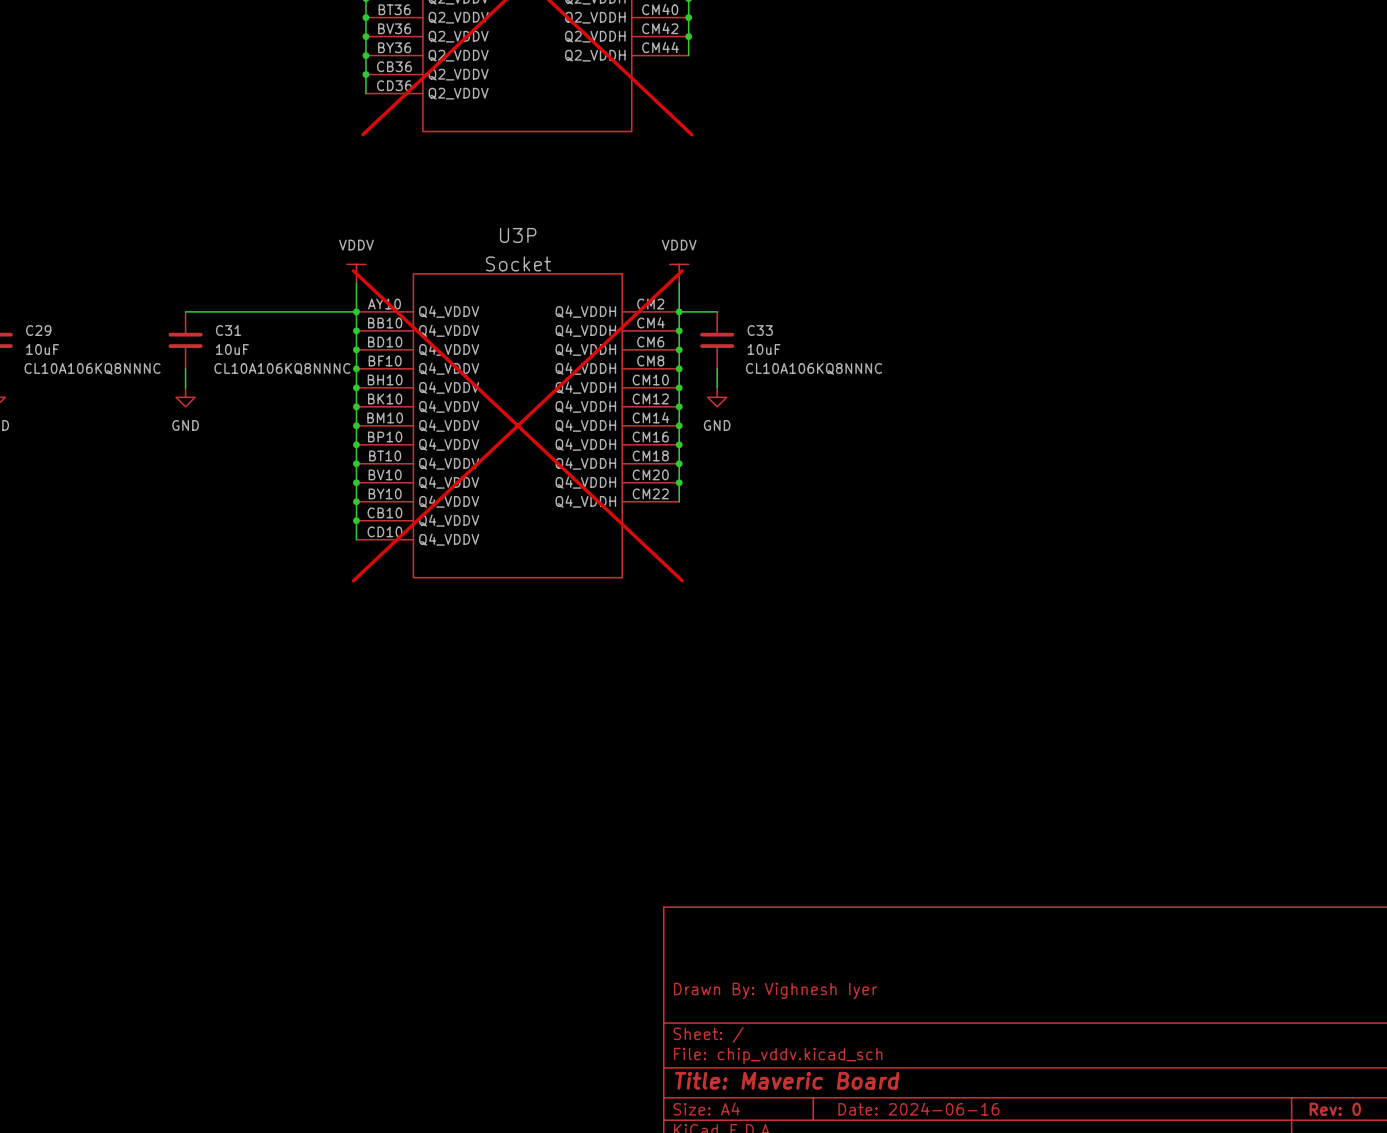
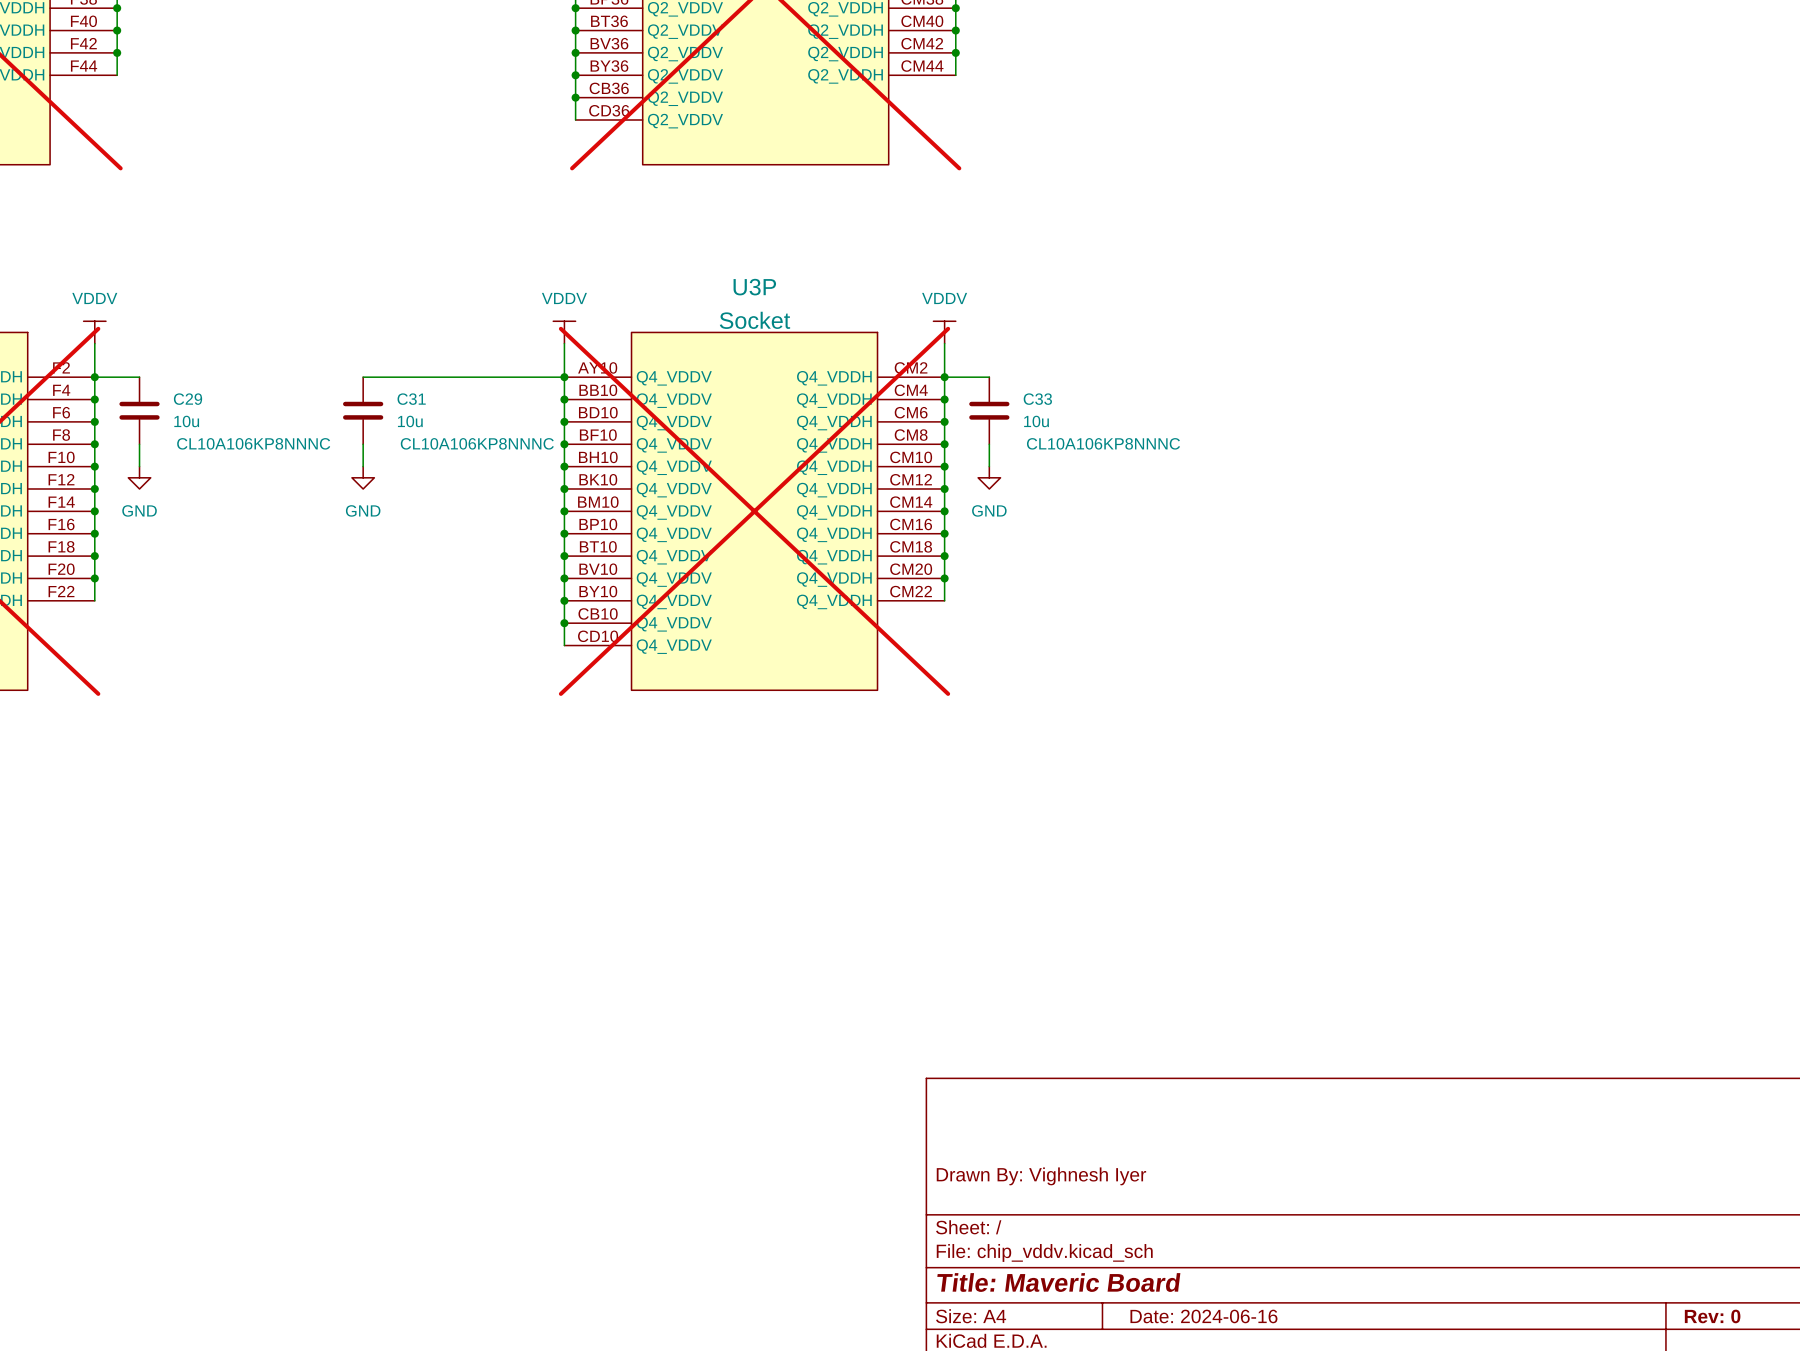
C29 value: 10uF (42, 349) -> 10u (186, 421)
C31 value: 10uF (232, 349) -> 10u (410, 421)
C33 value: 10uF (764, 349) -> 10u (1036, 421)
C29 text: CL10A106KQ8NNNC (92, 368) -> CL10A106KP8NNNC (253, 443)
C31 text: CL10A106KQ8NNNC (282, 368) -> CL10A106KP8NNNC (477, 443)
C33 text: CL10A106KQ8NNNC (814, 368) -> CL10A106KP8NNNC (1103, 443)

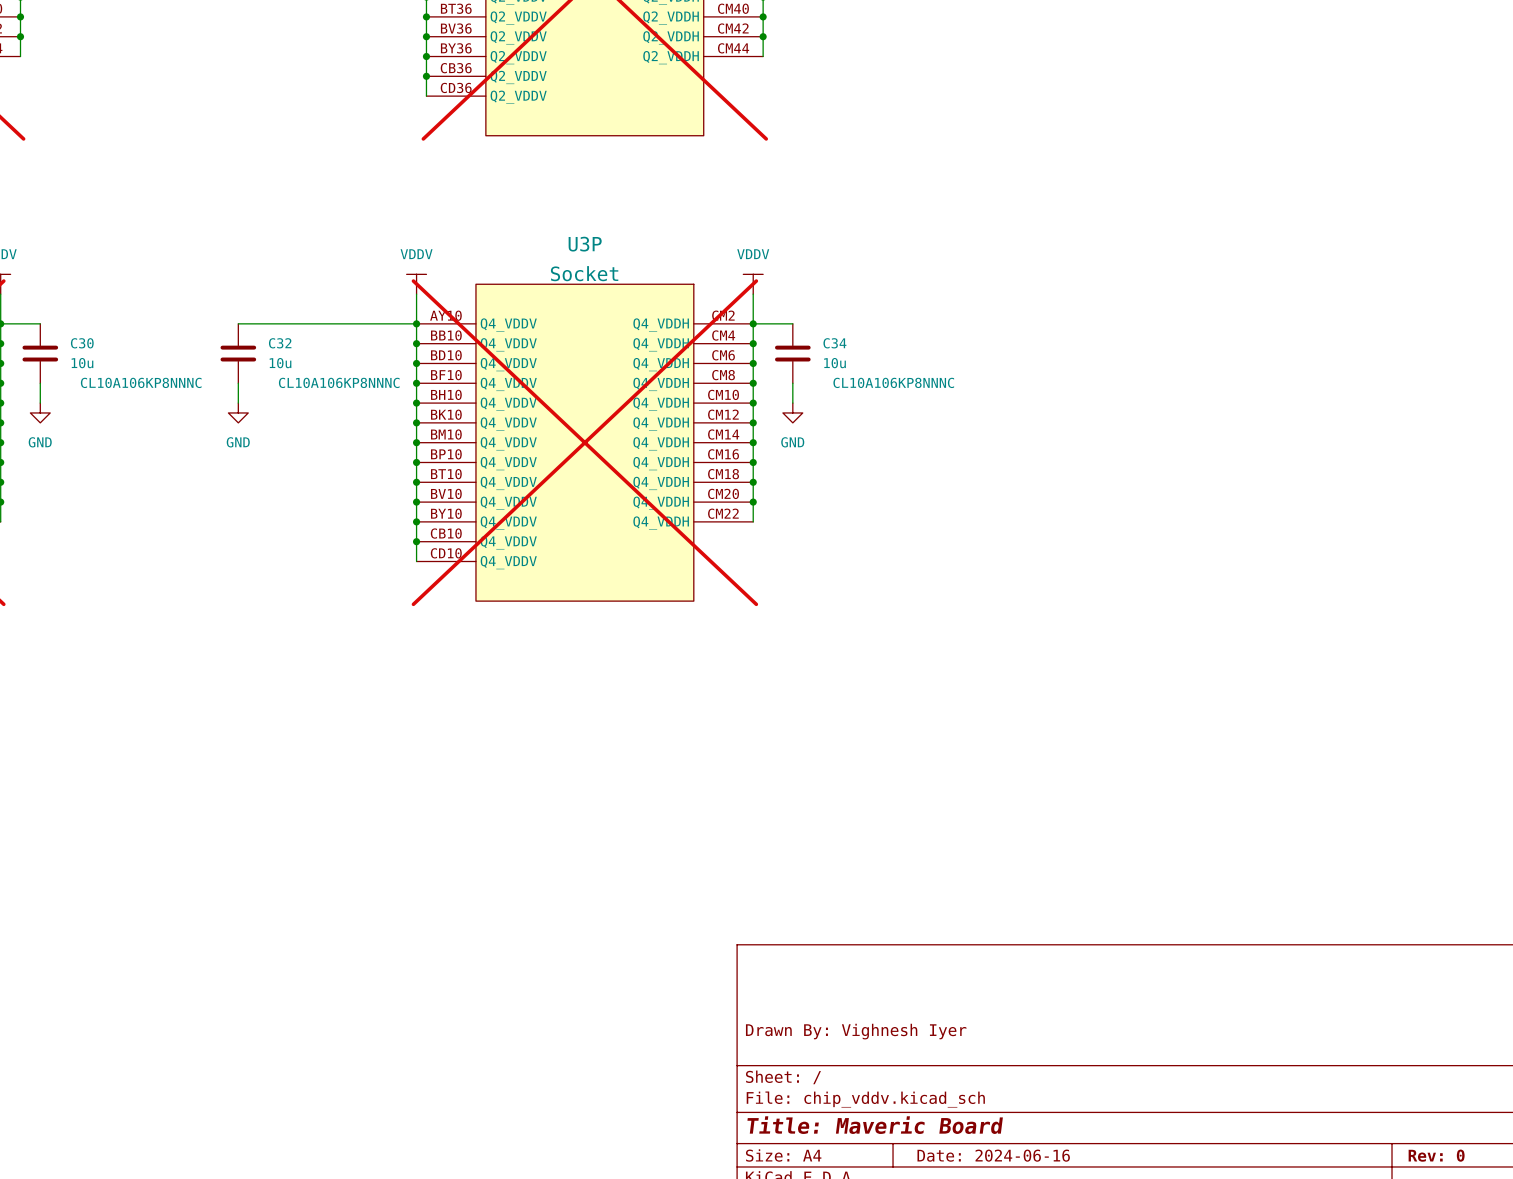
C29 name: C29 (188, 399) -> C30 (82, 343)
C31 name: C31 (411, 399) -> C32 (280, 343)
C33 name: C33 (1037, 399) -> C34 (834, 343)

